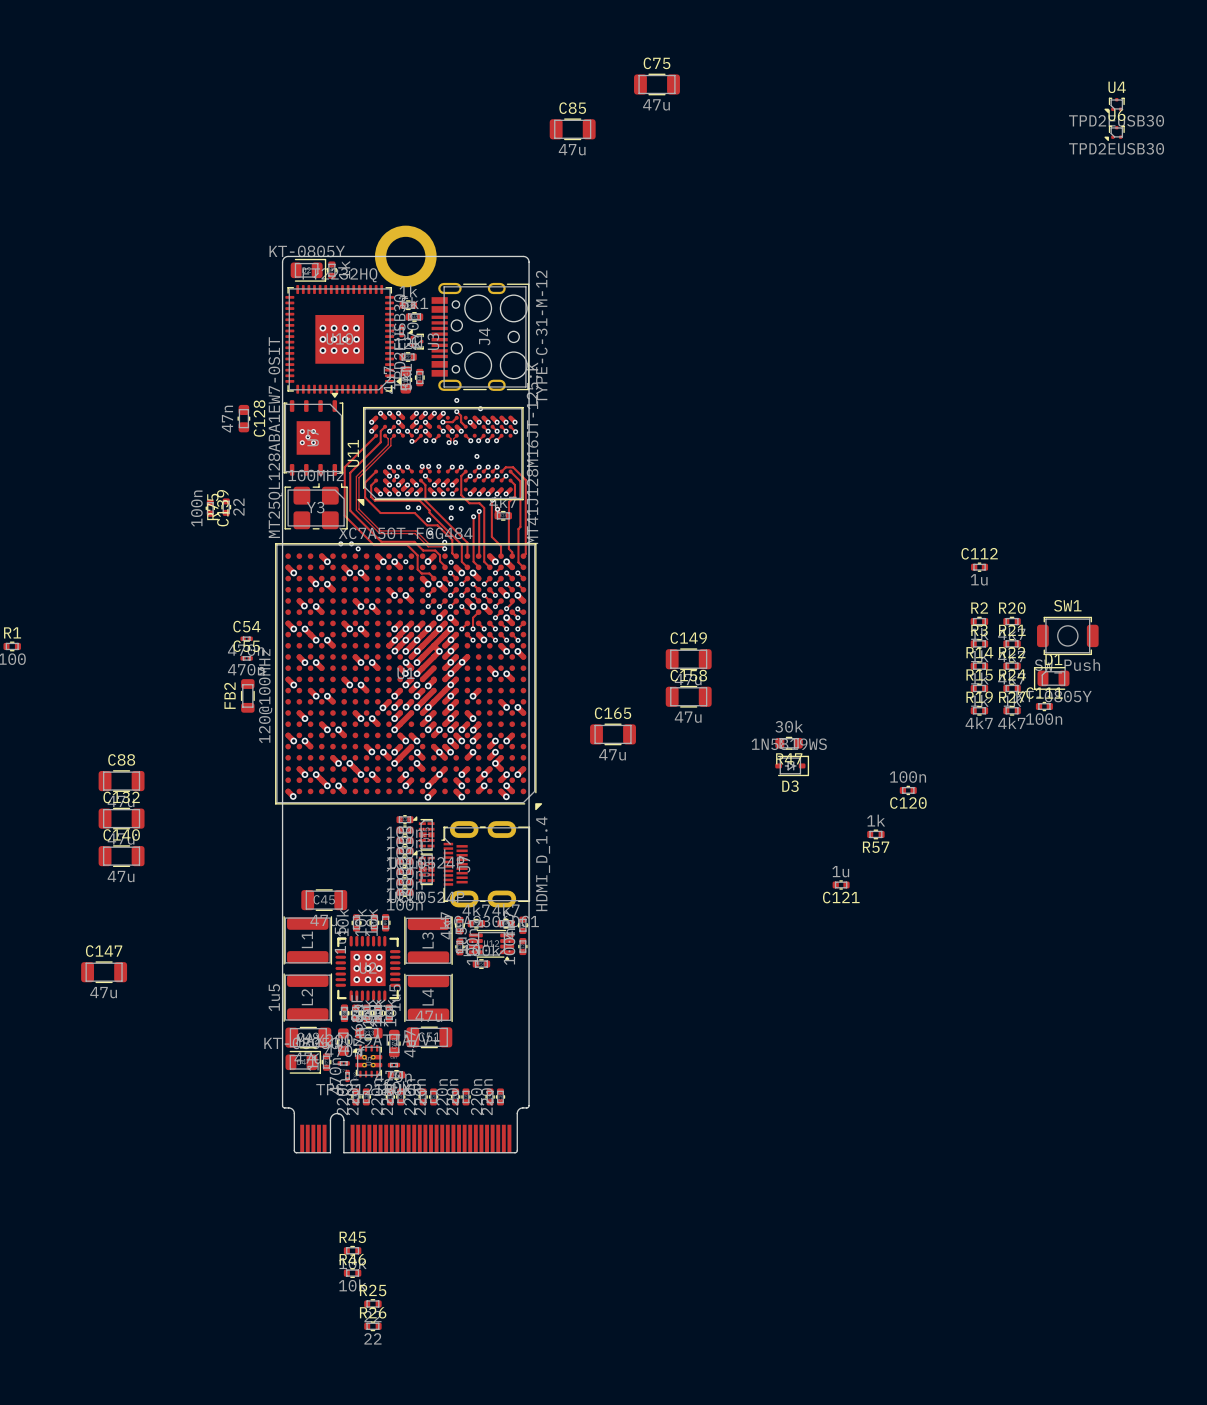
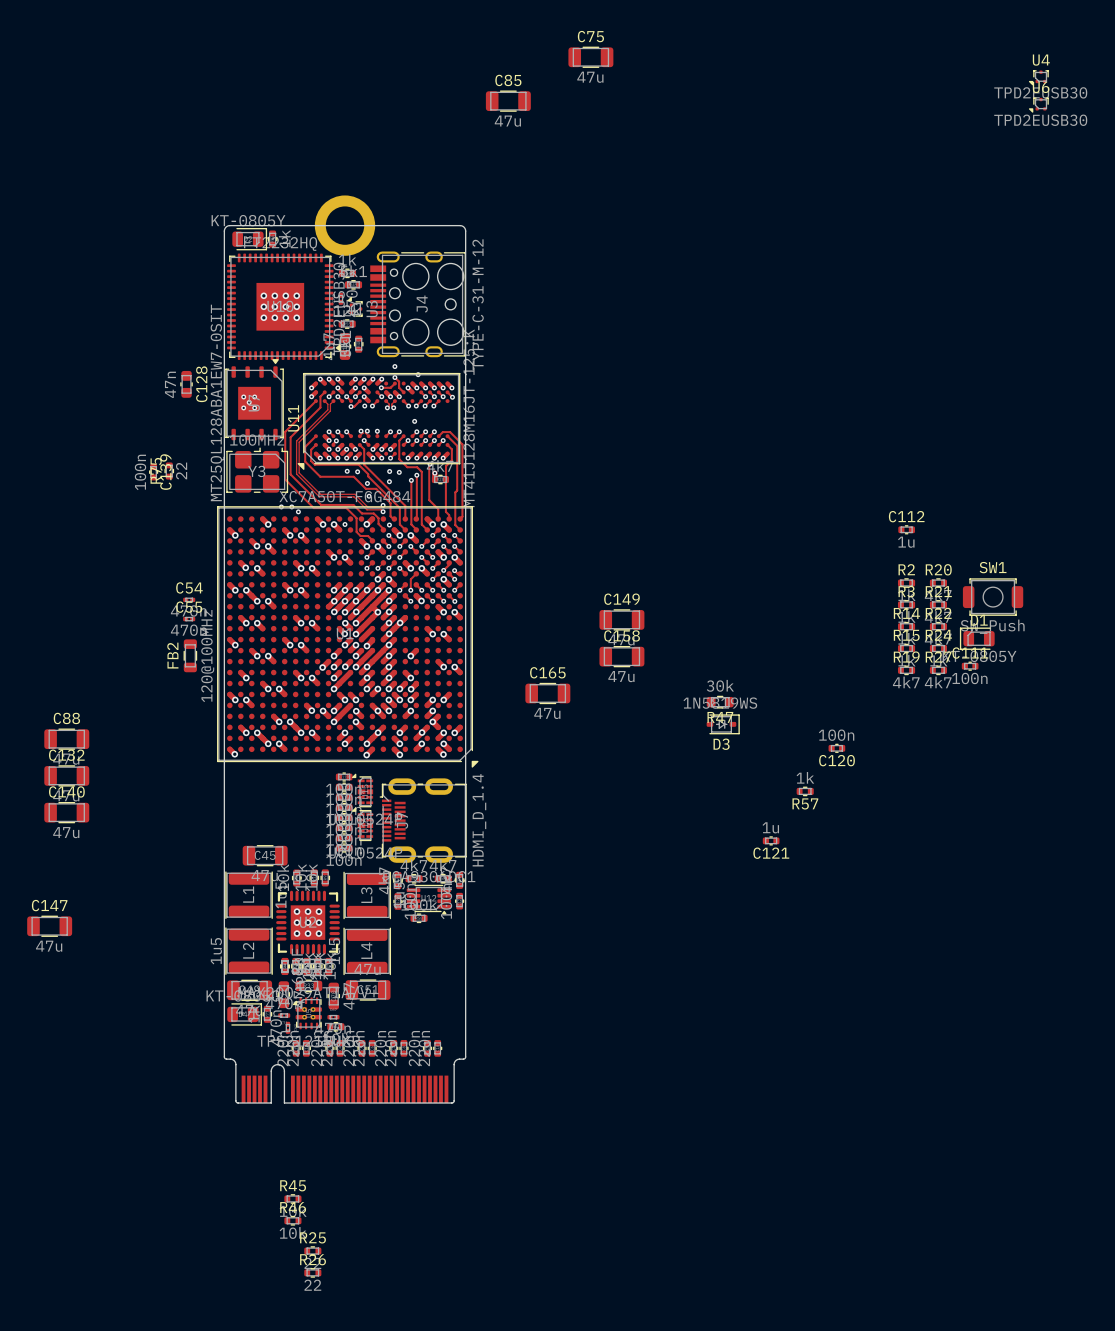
track: (473, 595) (478, 600) -> none
via: (473, 595) -> none

